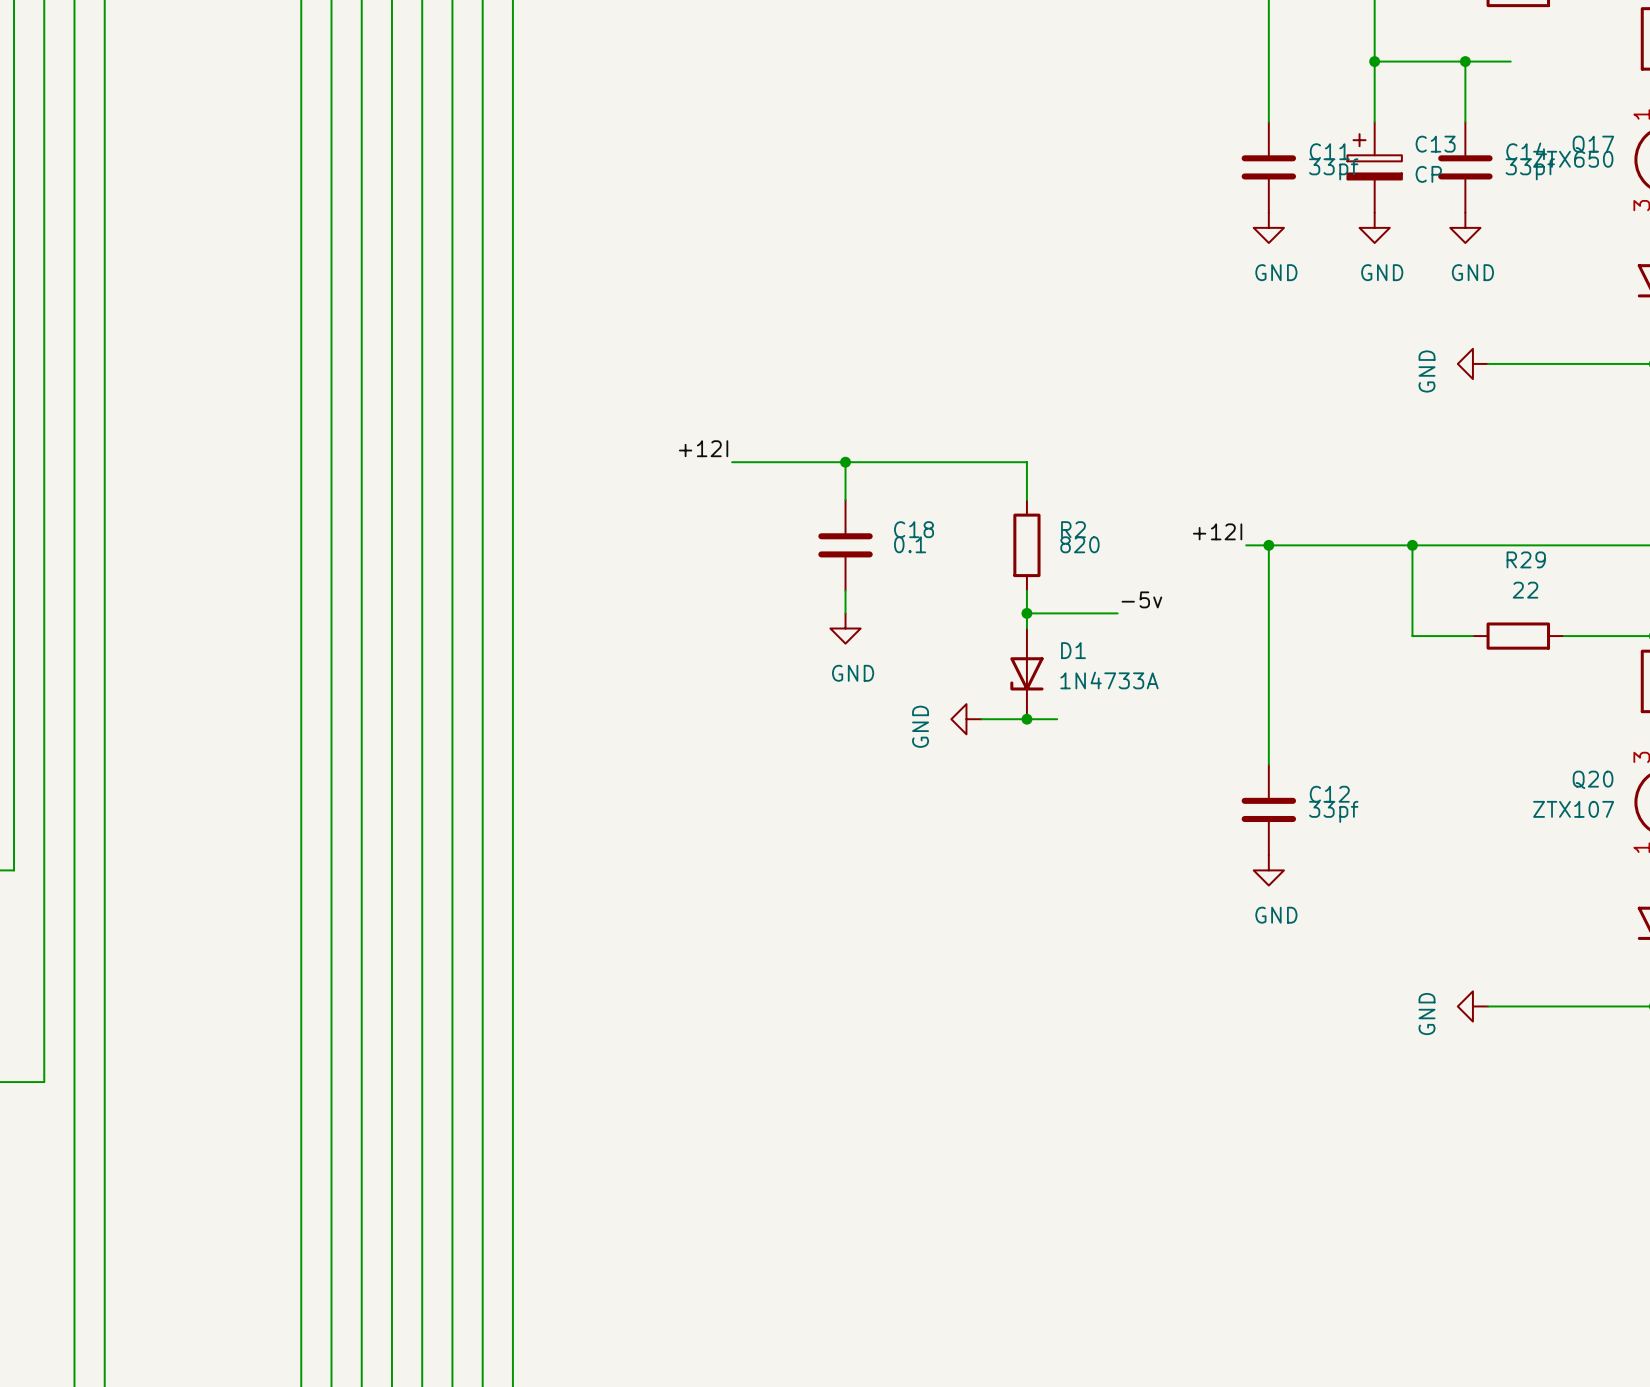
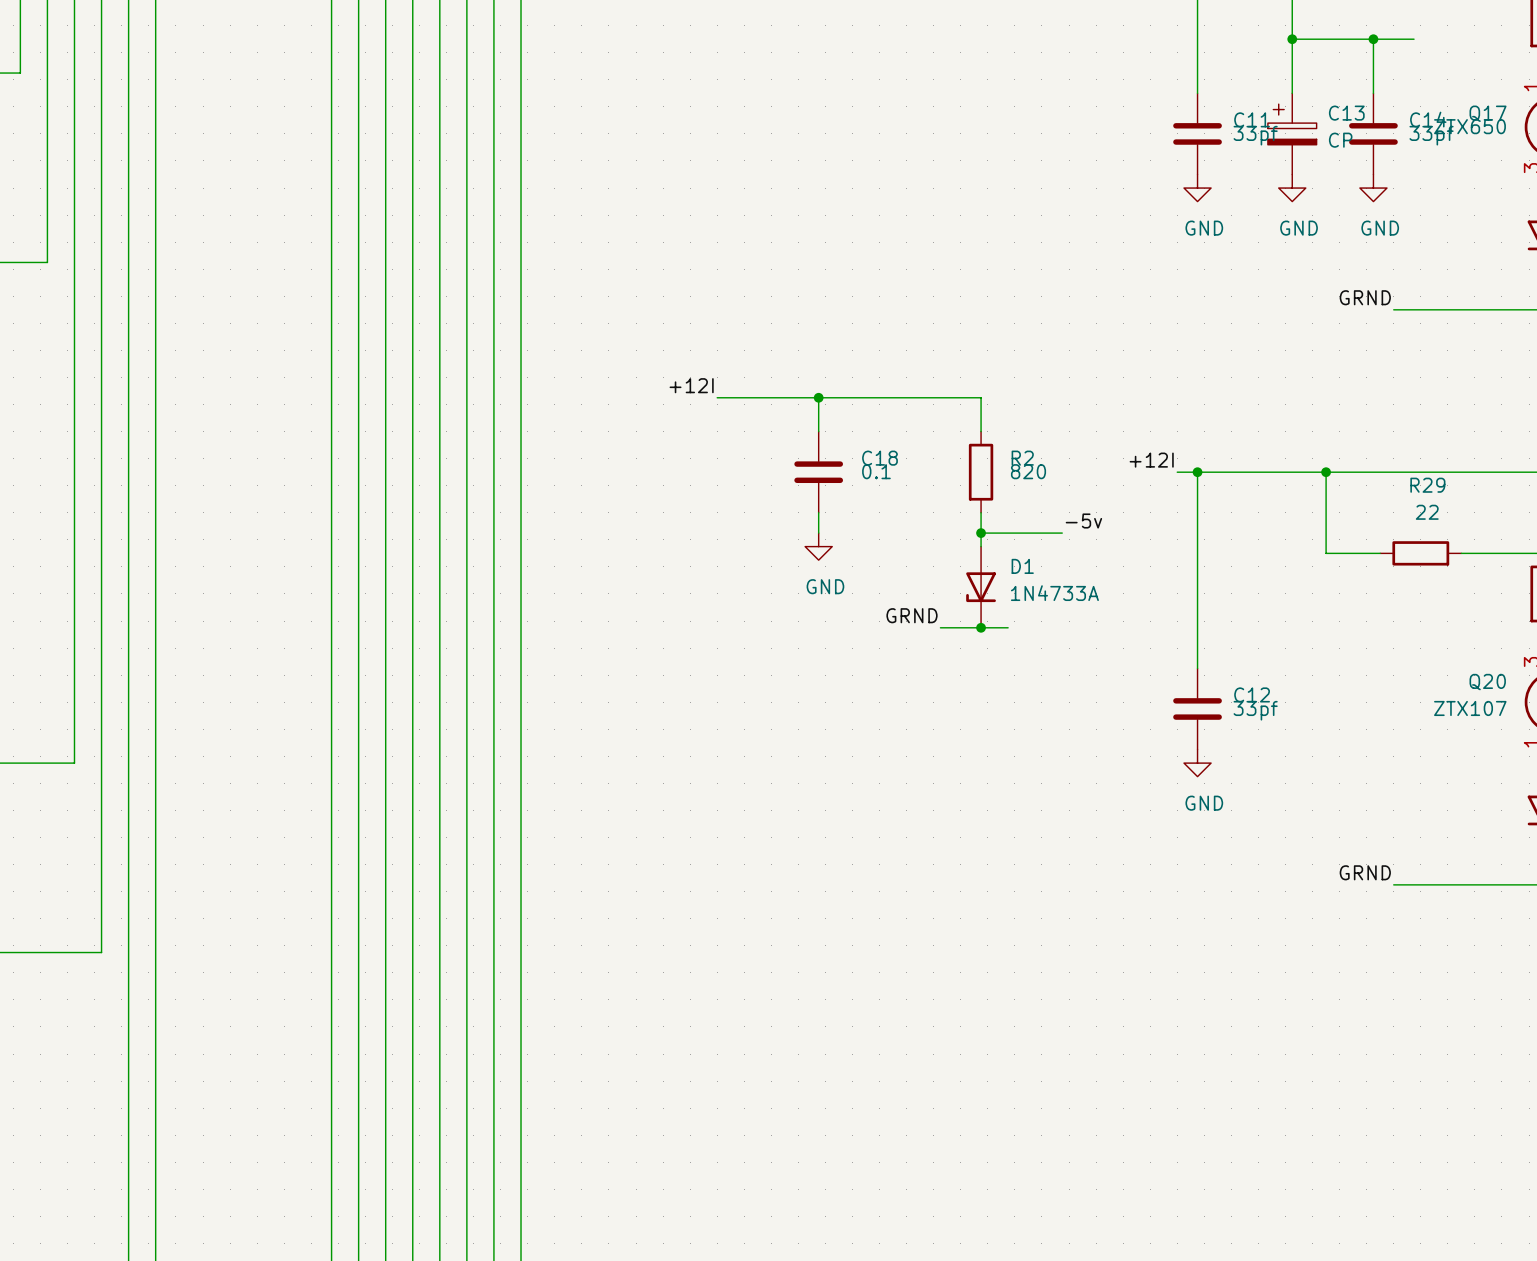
label: none -> GRND (1365, 297)
power symbol: GND (1472, 363) -> none
label: none -> GRND (912, 615)
power symbol: GND (966, 719) -> none
label: none -> GRND (1365, 872)
power symbol: GND (1472, 1006) -> none

